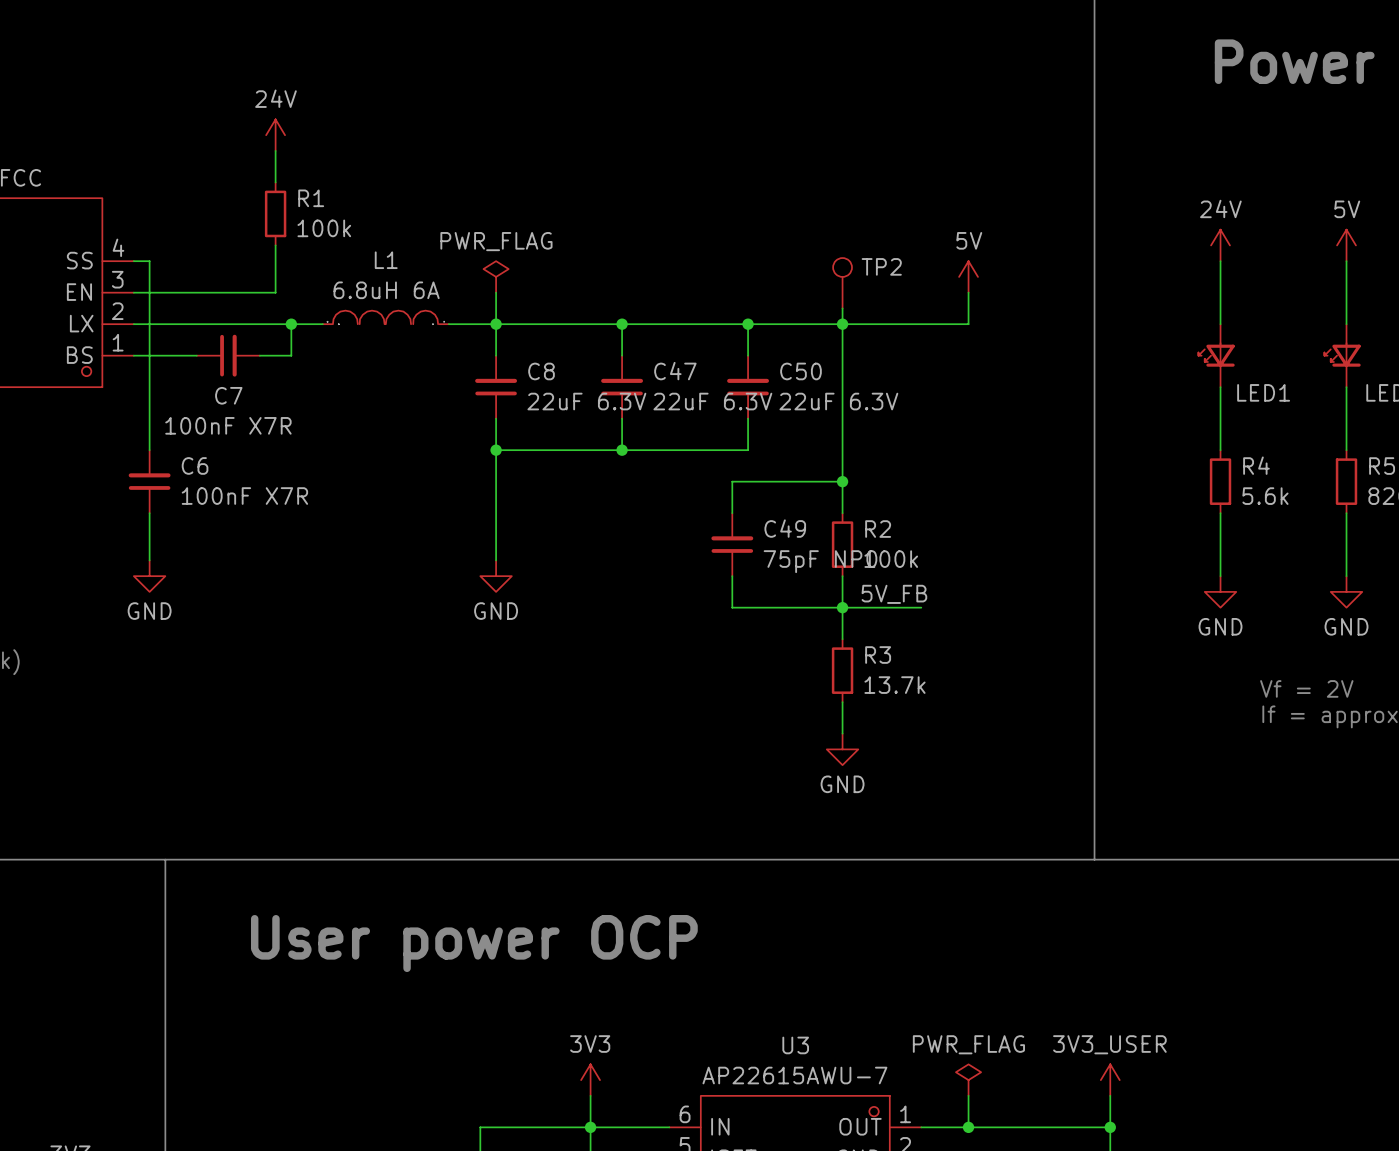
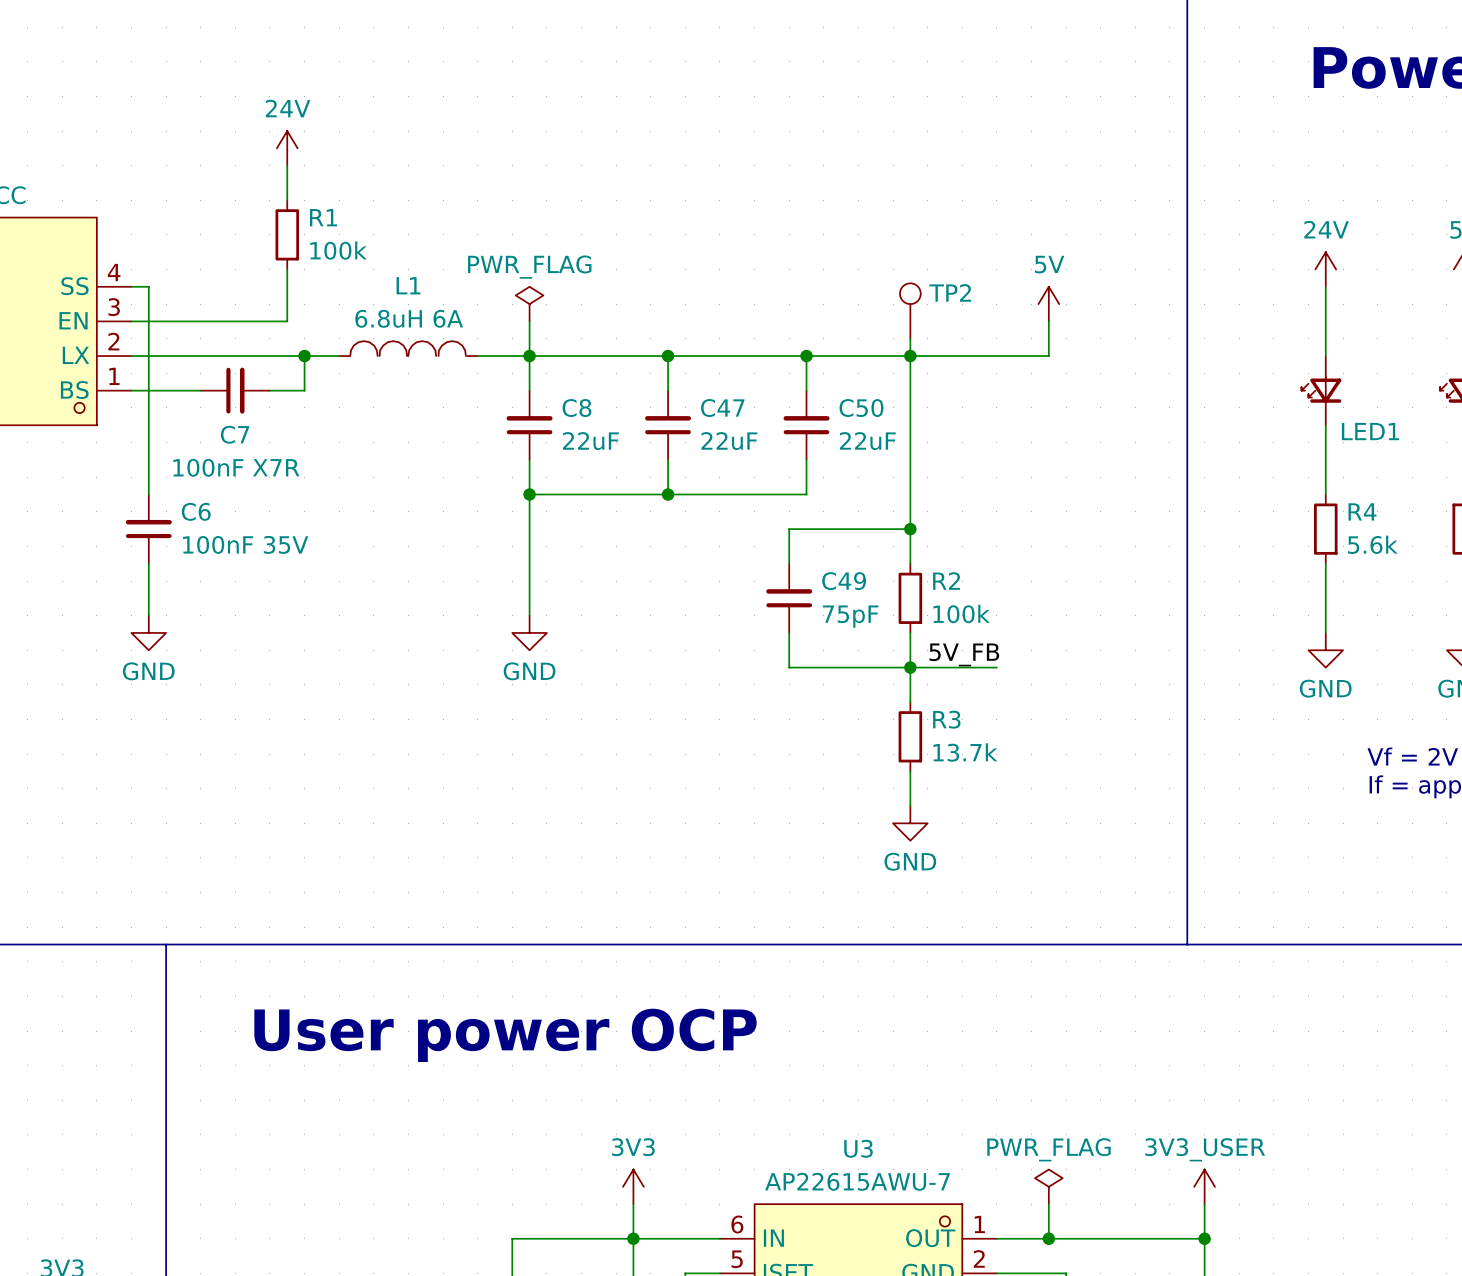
C8 value: 22uF 6.3V (586, 401) -> 22uF (590, 441)
C47 value: 22uF 6.3V (712, 401) -> 22uF (729, 441)
C50 value: 22uF 6.3V (838, 401) -> 22uF (867, 441)
C6 value: 100nF X7R (244, 496) -> 100nF 35V (245, 544)
C49 value: 75pF NP0 (820, 561) -> 75pF (850, 616)

